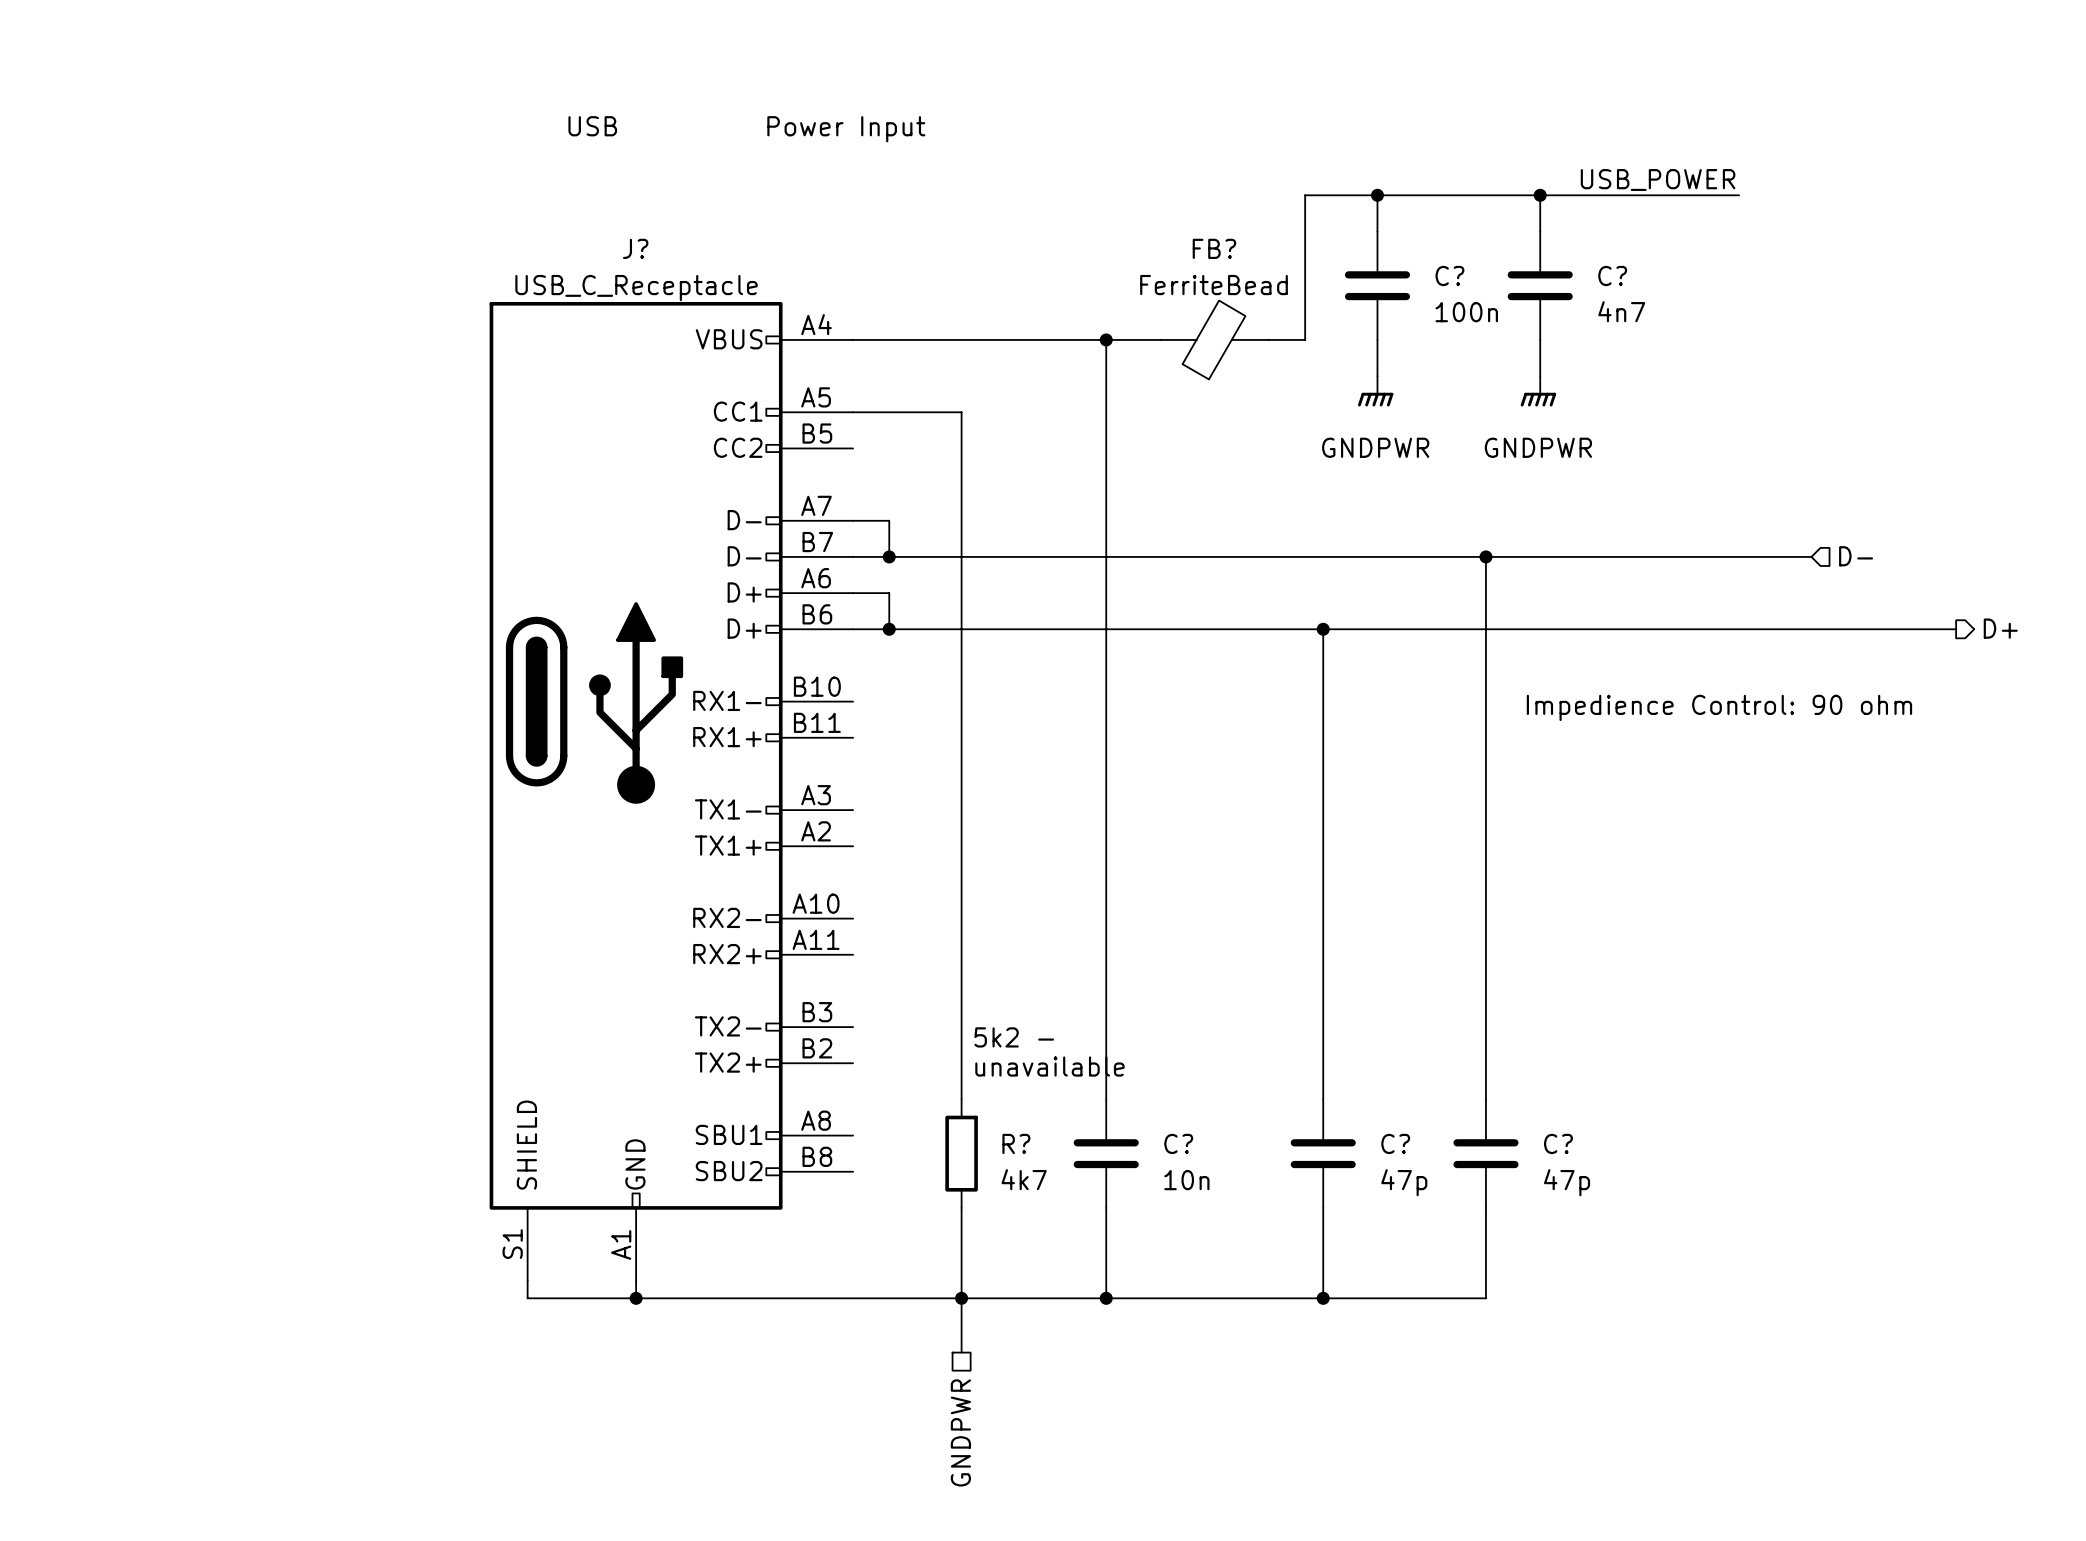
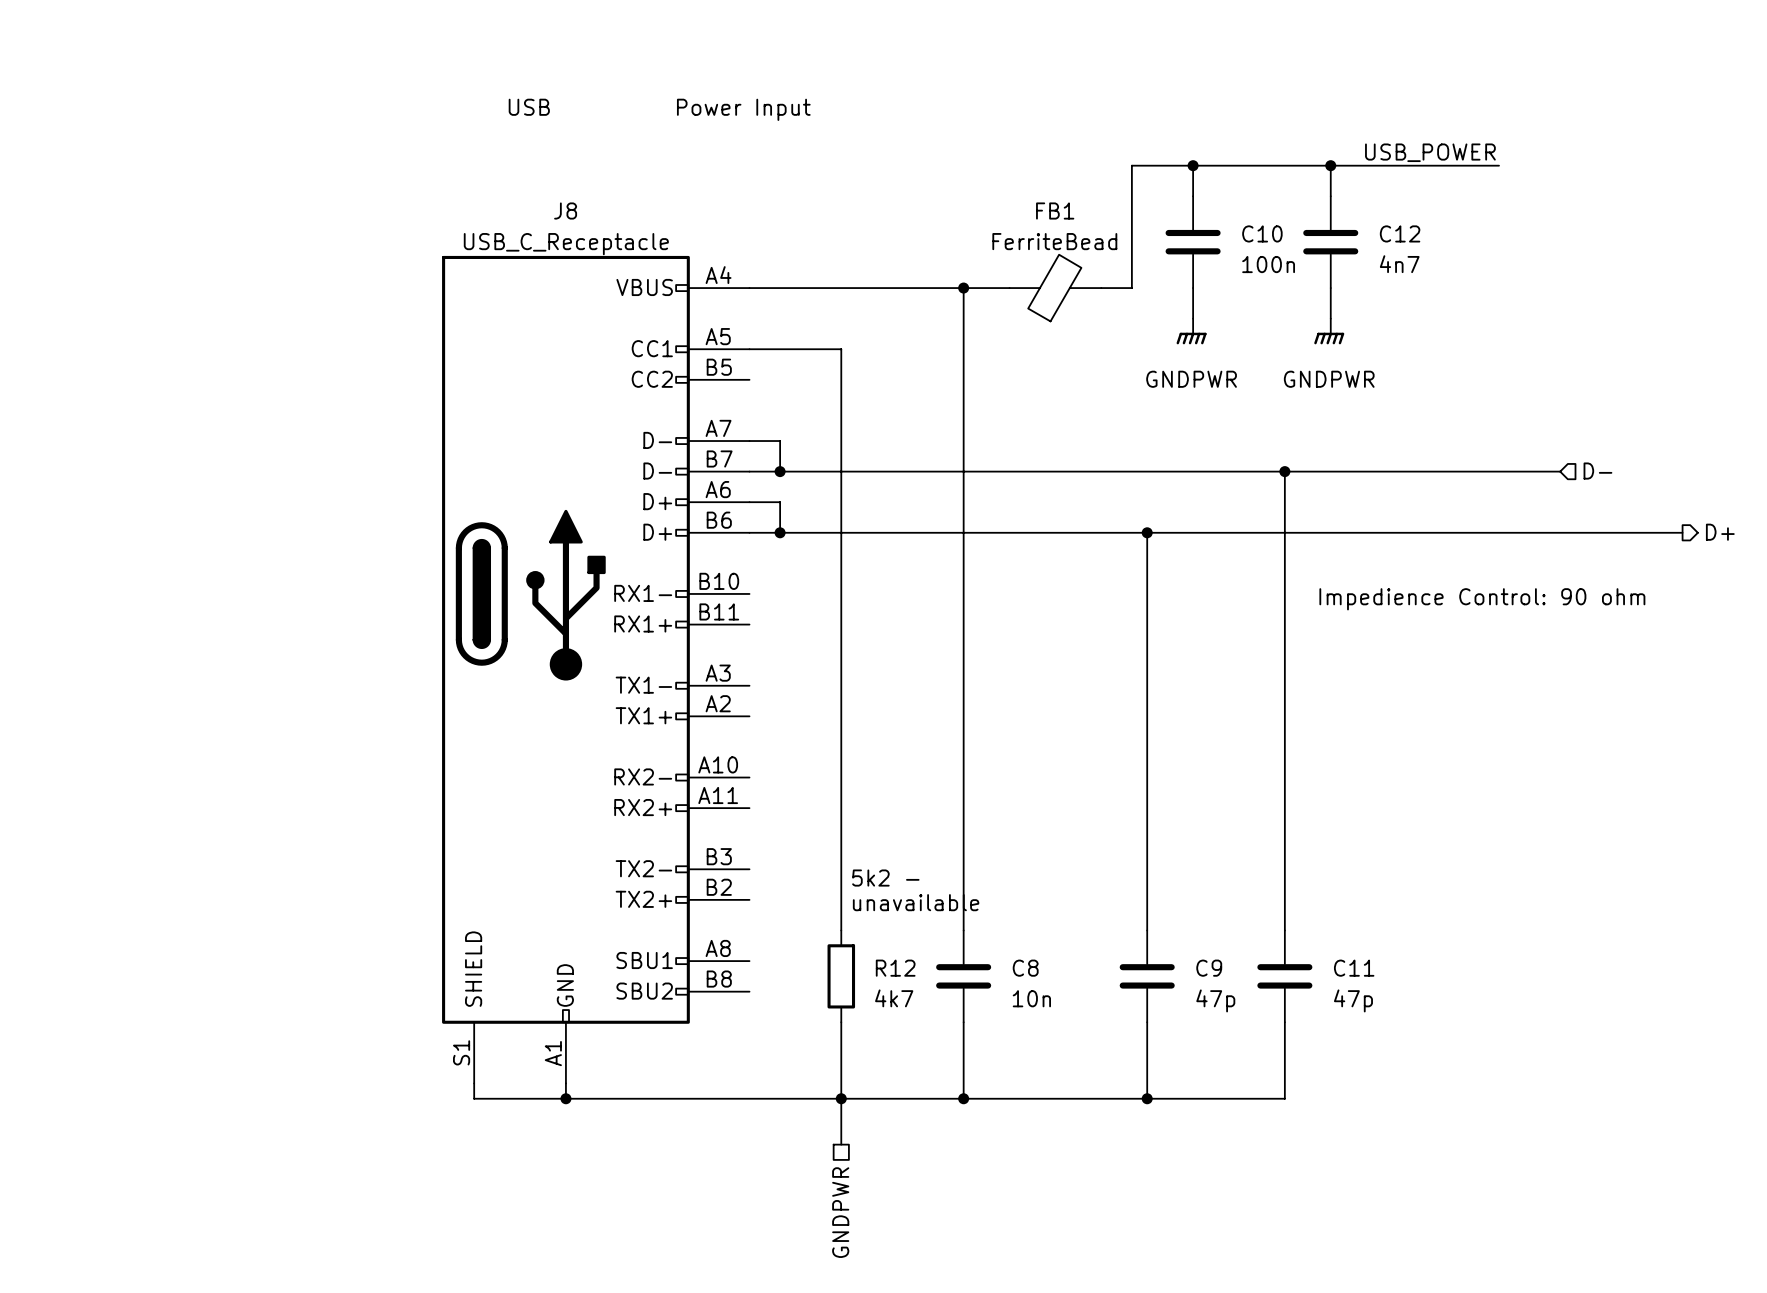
J? name: J? (635, 248) -> J8 (565, 211)
FB? name: FB? (1214, 248) -> FB1 (1055, 211)
C? name: C? (1449, 275) -> C10 (1262, 233)
C? name: C? (1612, 275) -> C12 (1400, 233)
R? name: R? (1016, 1143) -> R12 (895, 968)
C? name: C? (1178, 1143) -> C8 (1025, 968)
C? name: C? (1395, 1143) -> C9 (1209, 968)
C? name: C? (1558, 1143) -> C11 (1354, 968)

